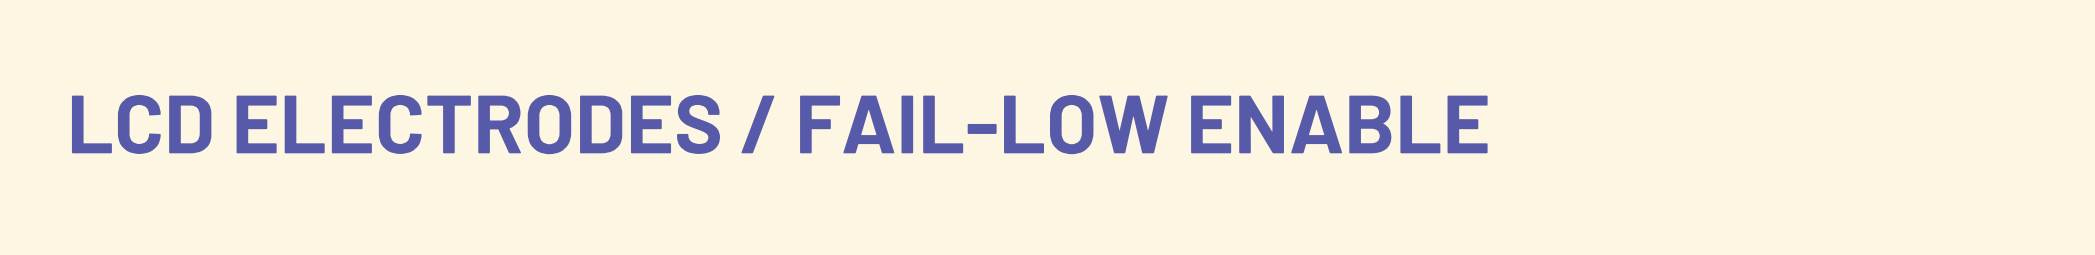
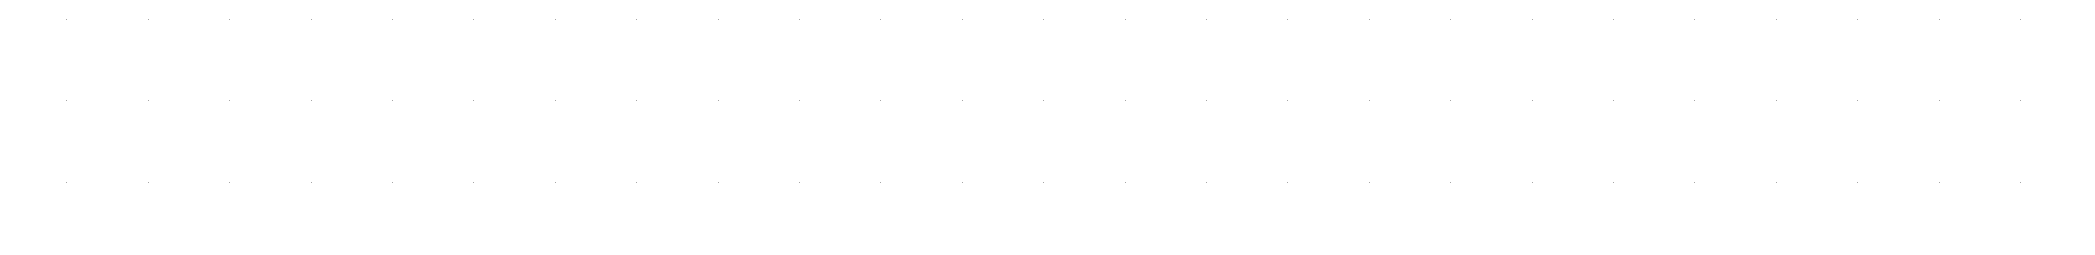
text: LCD ELECTRODES / FAIL-LOW ENABLE (779, 124) -> none

